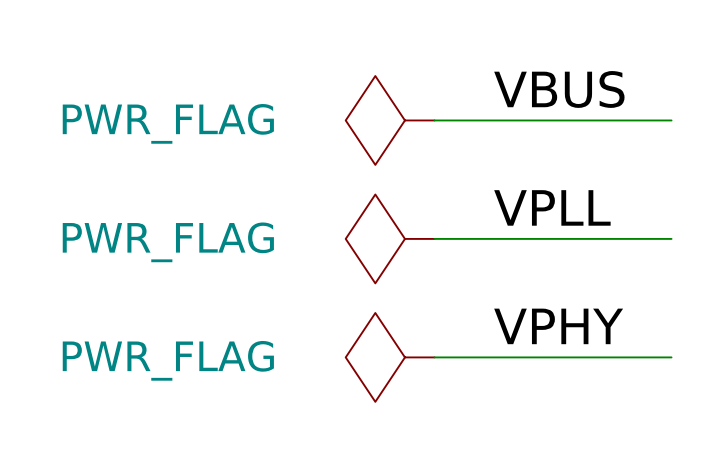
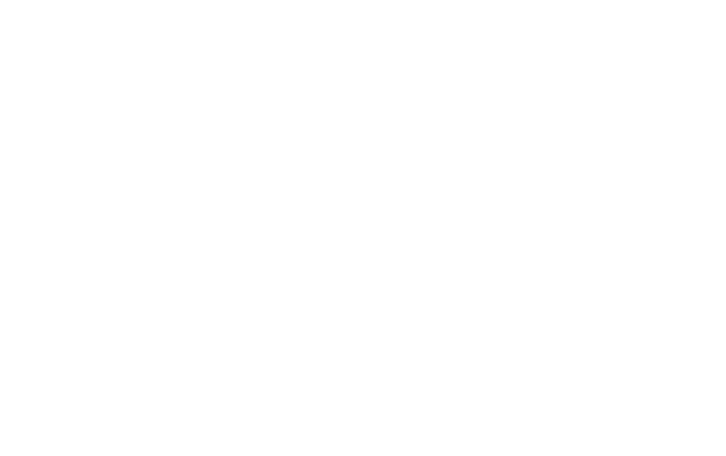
label: VBUS (559, 89) -> none
power symbol: PWR_FLAG (390, 120) -> none
wire: (434, 120) (671, 120) -> none
label: VPLL (552, 207) -> none
power symbol: PWR_FLAG (390, 238) -> none
wire: (434, 238) (671, 238) -> none
label: VPHY (558, 326) -> none
power symbol: PWR_FLAG (390, 357) -> none
wire: (434, 357) (671, 357) -> none

